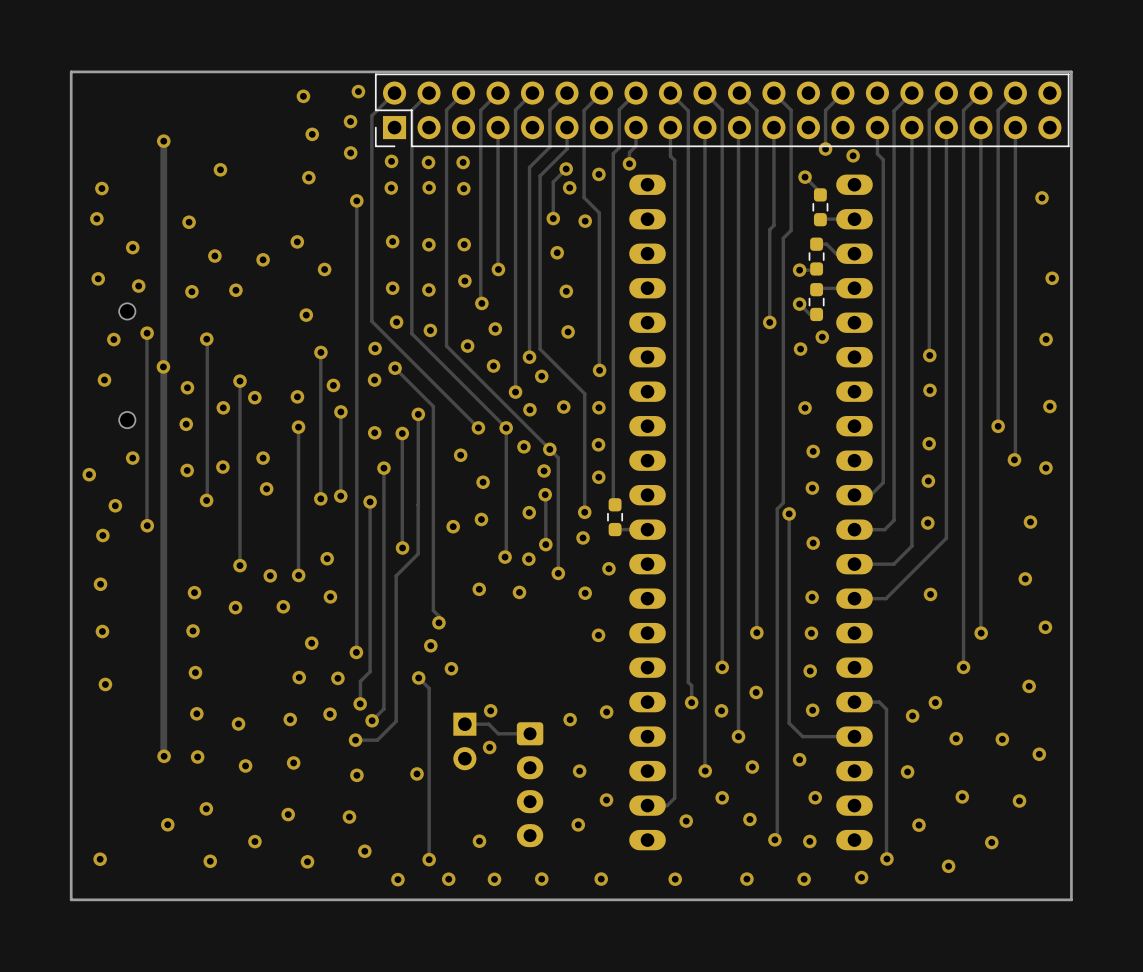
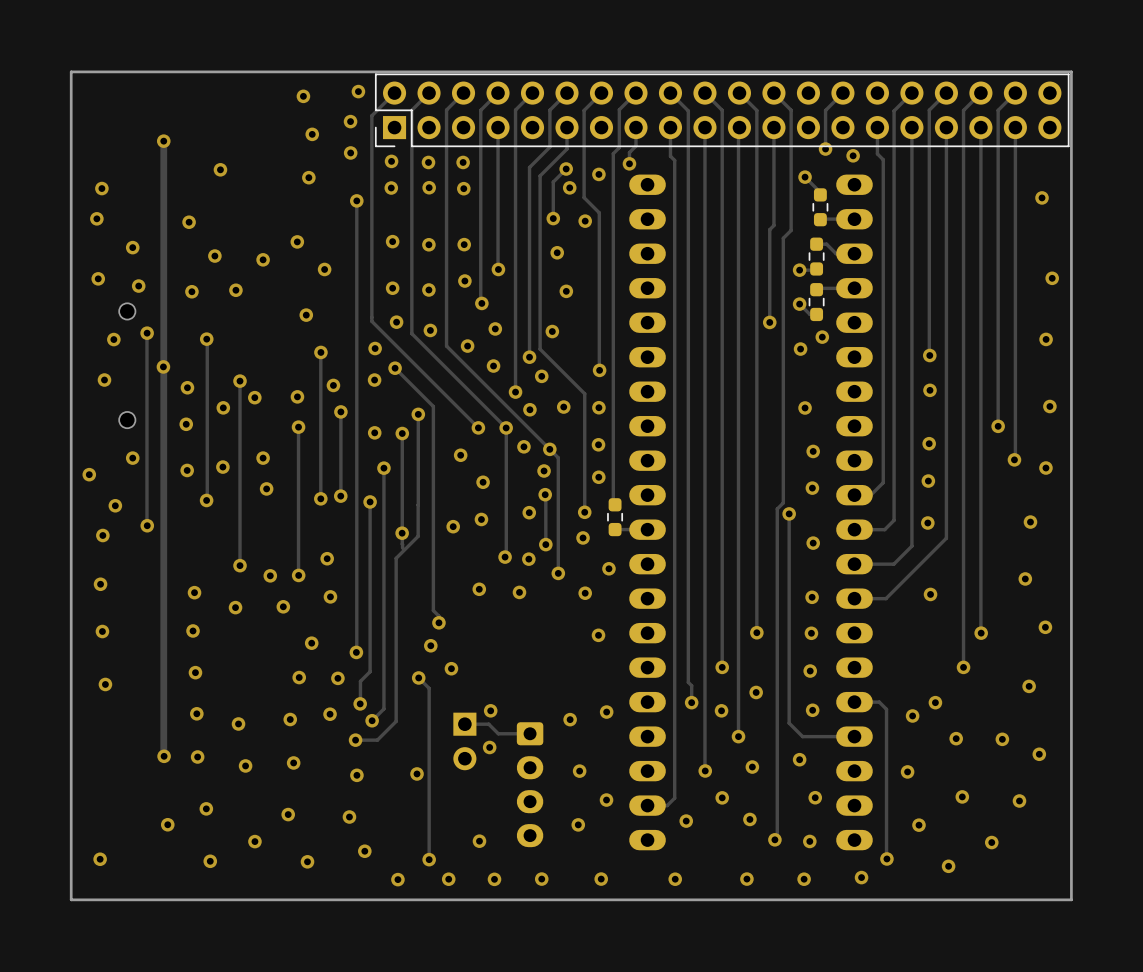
via position: (568, 331) -> (552, 331)
track: (418, 536) (418, 553) (396, 575) -> (418, 536) (396, 558) (396, 575)
via position: (402, 548) -> (402, 533)

